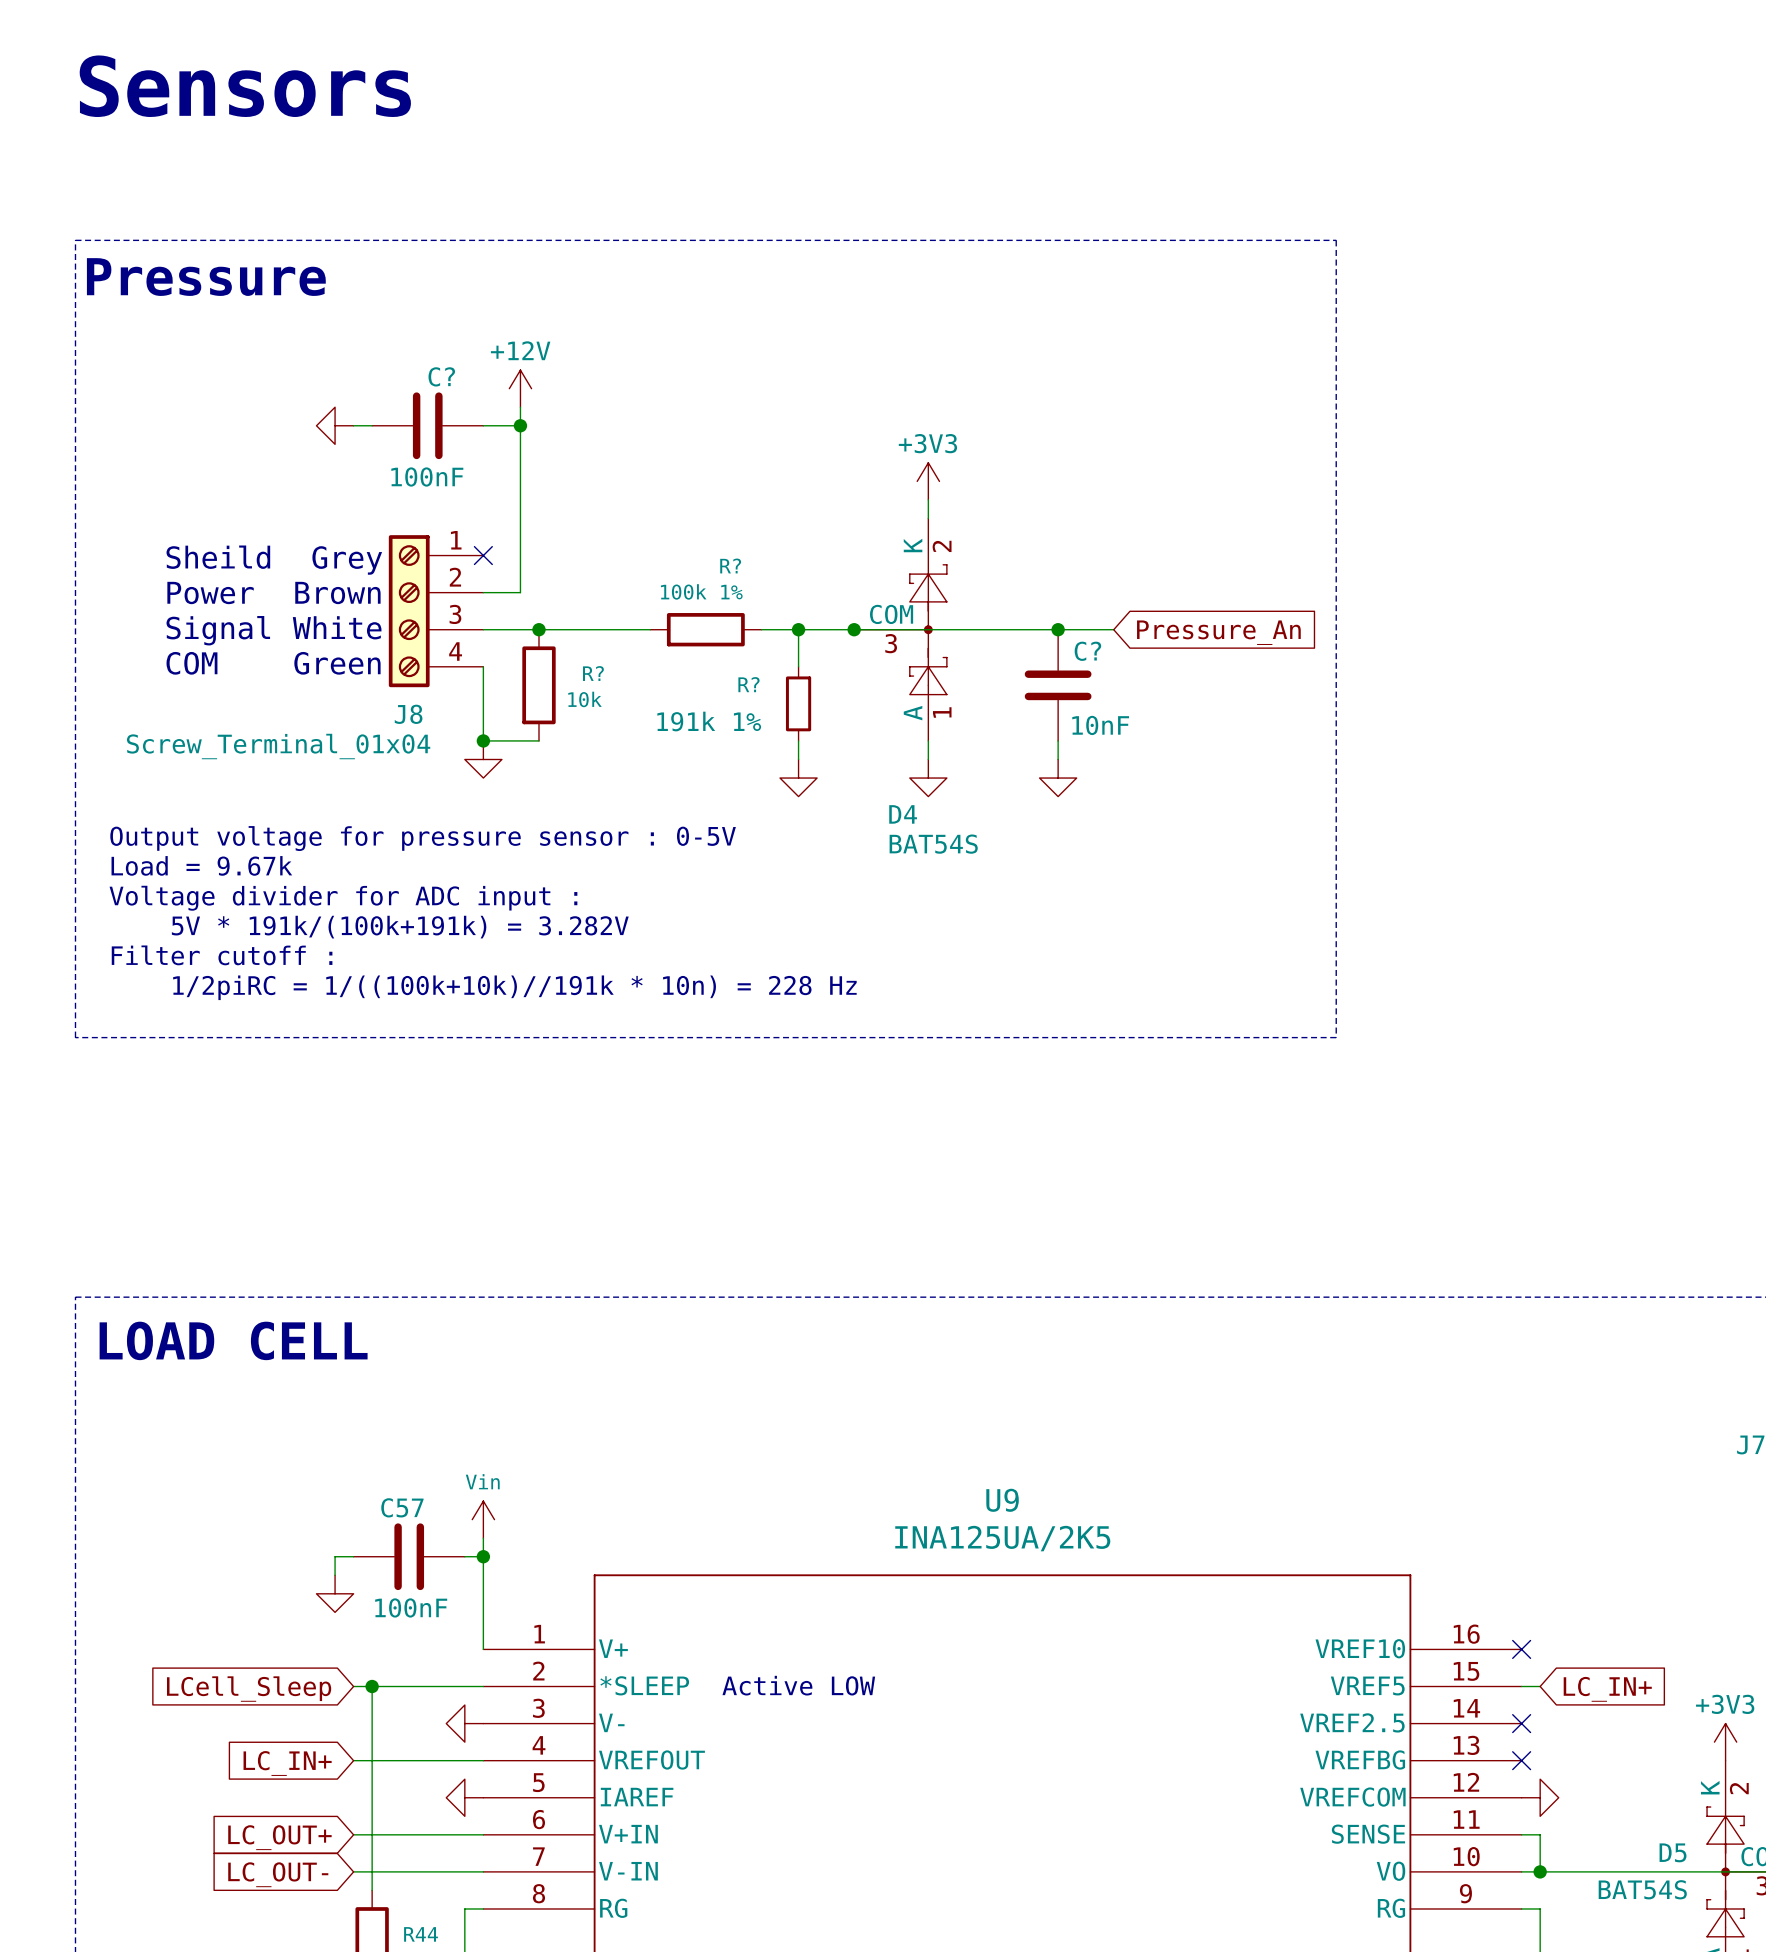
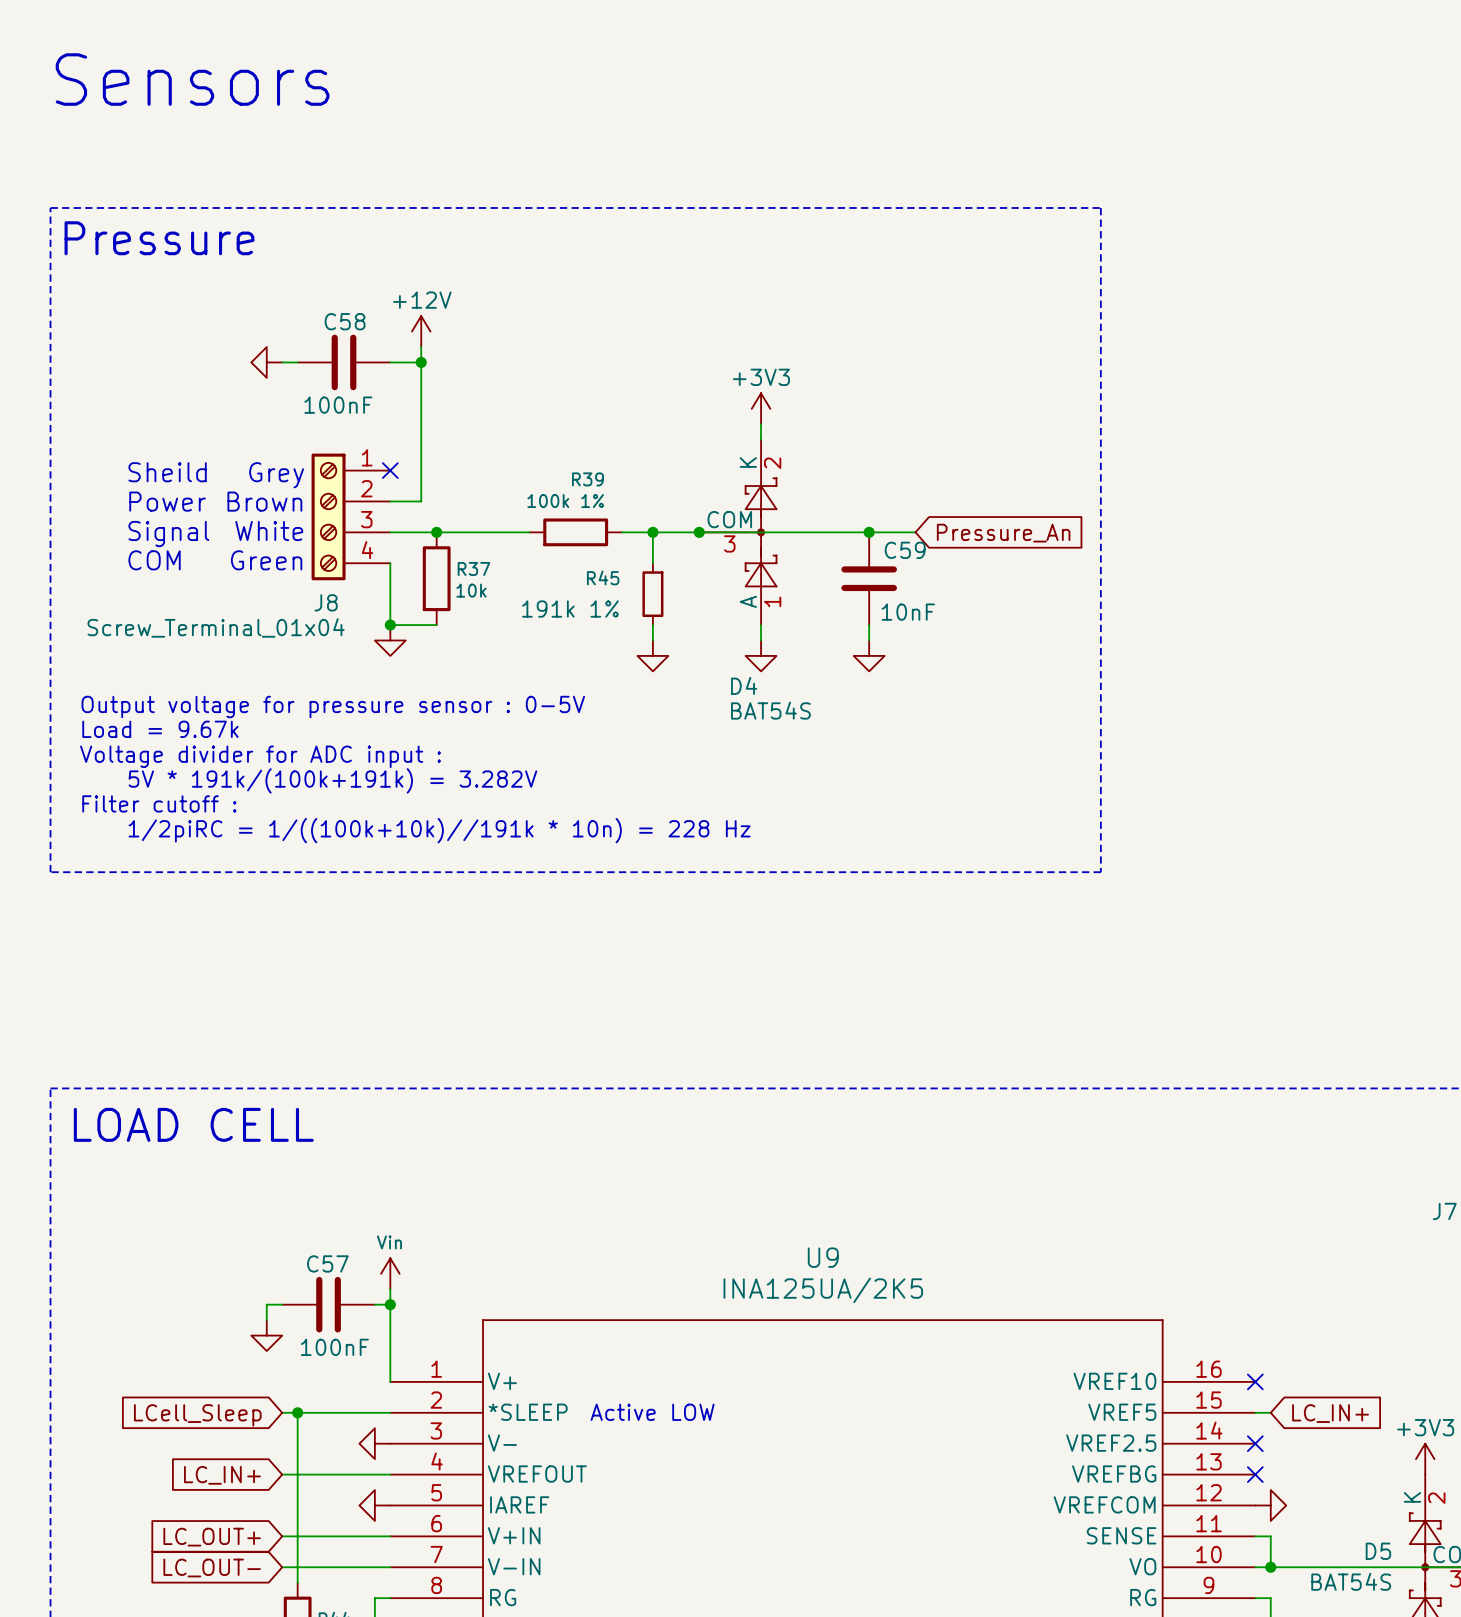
C? name: C? (441, 376) -> C58 (345, 321)
R? name: R? (730, 566) -> R39 (587, 479)
C? name: C? (1087, 651) -> C59 (905, 550)
R? name: R? (593, 673) -> R37 (473, 568)
R? name: R? (748, 684) -> R45 (603, 577)

